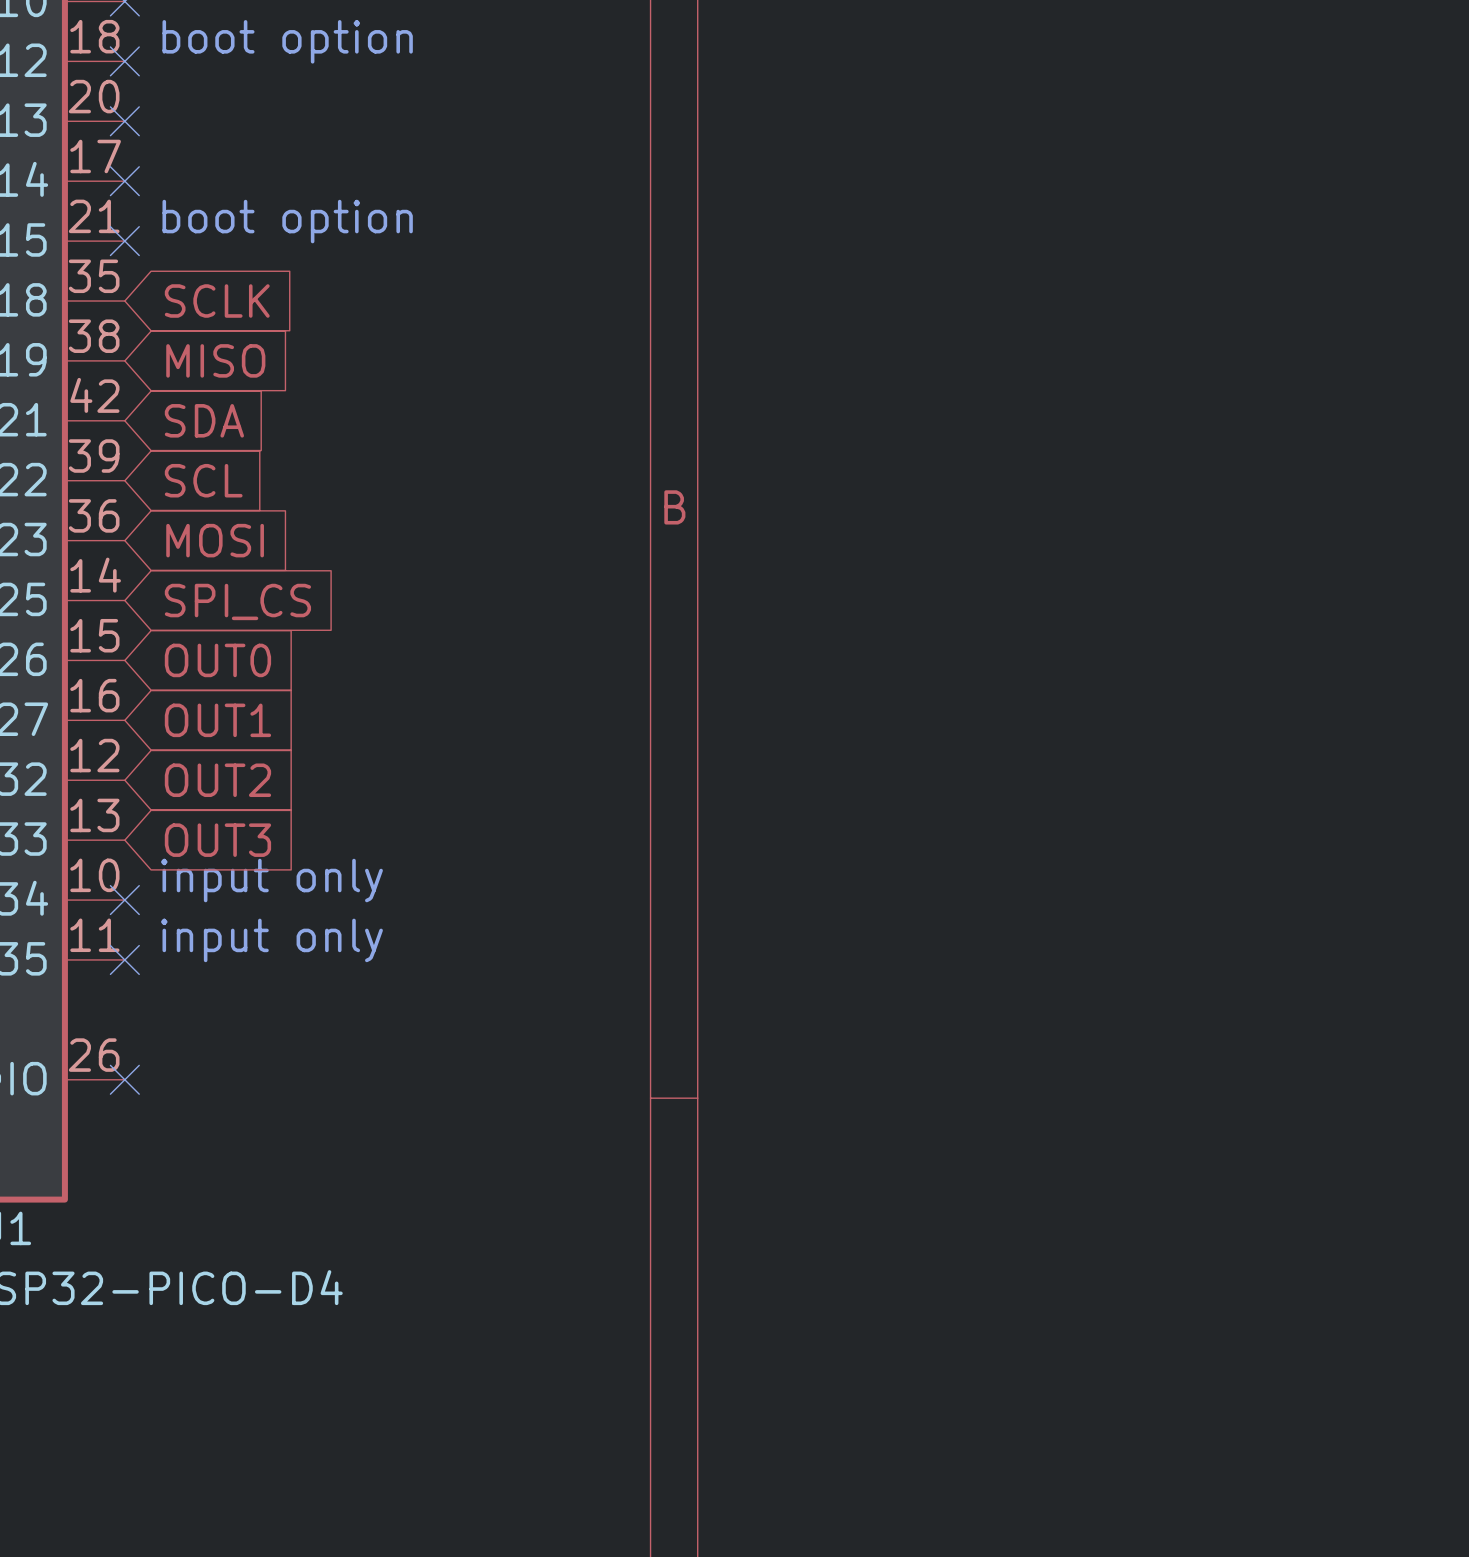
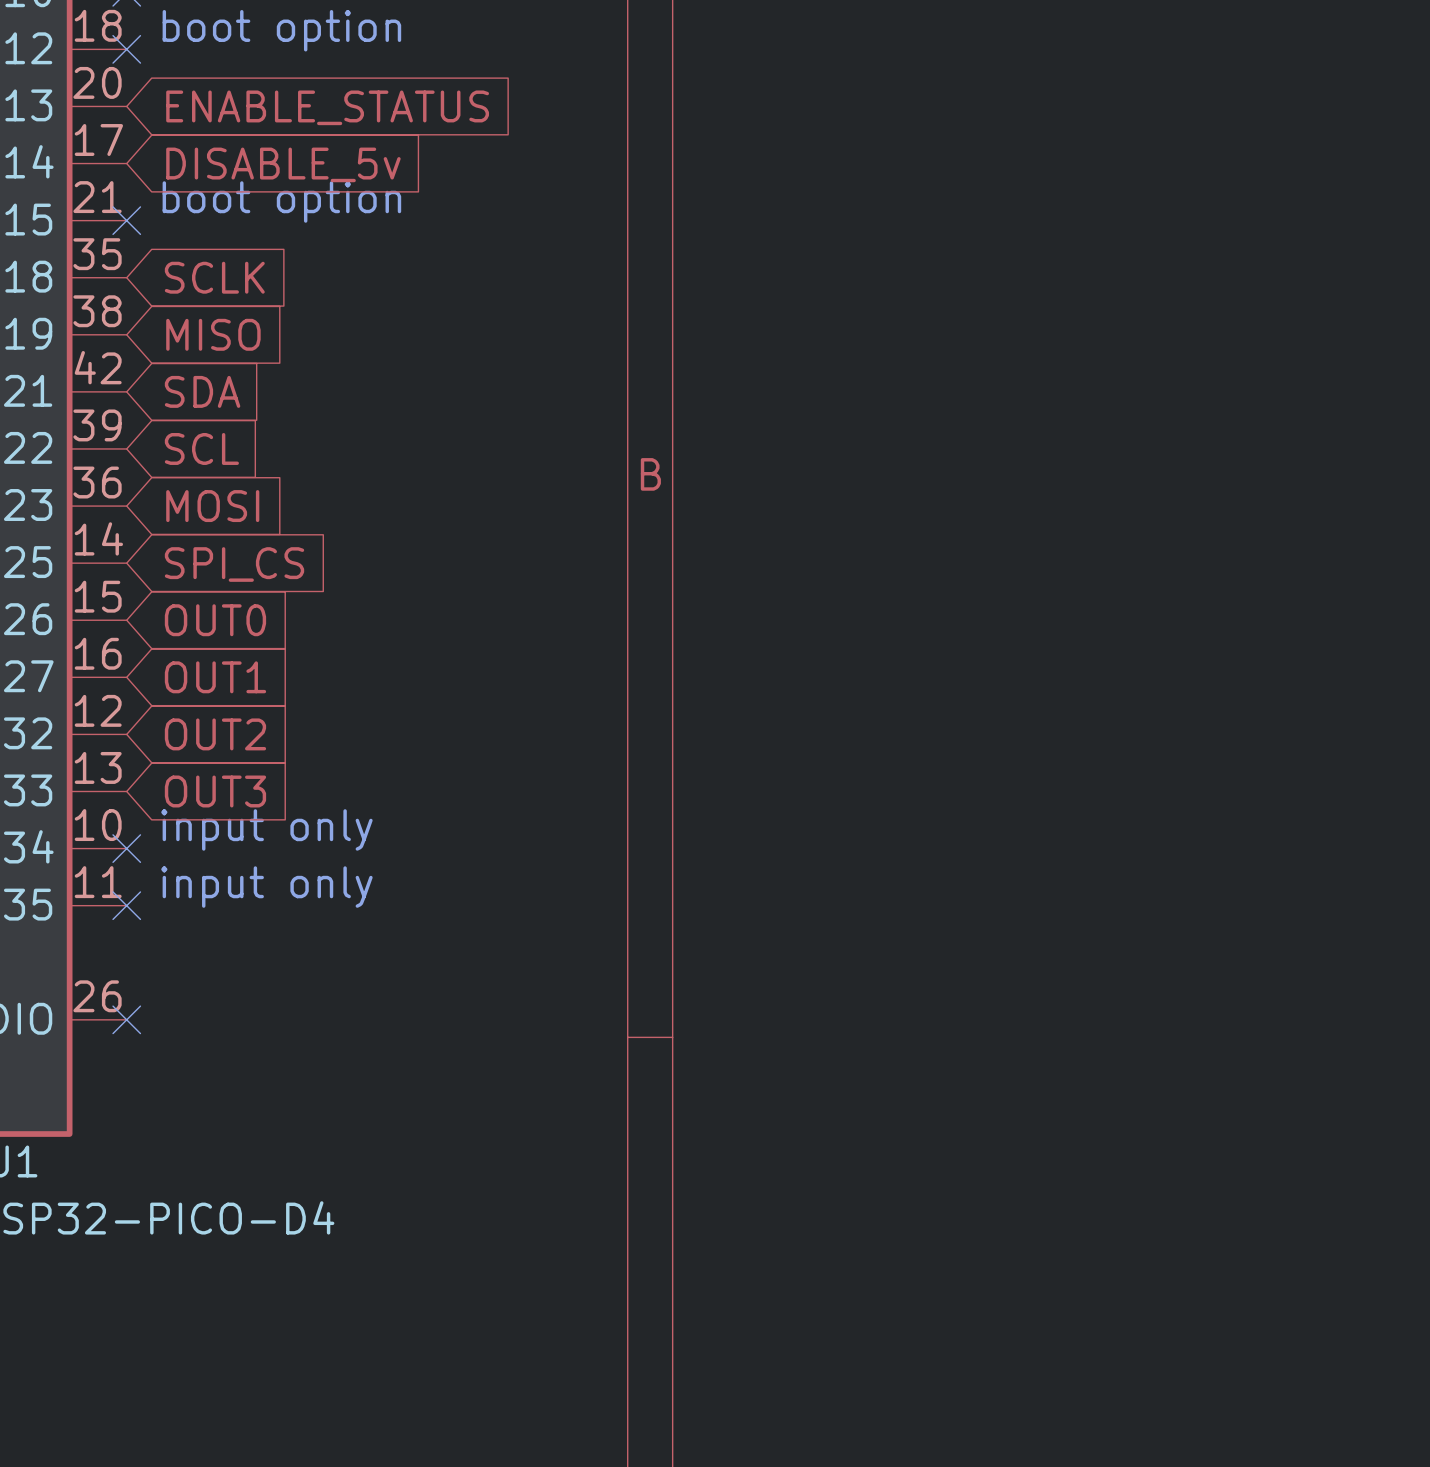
no-connect mark: (124, 121) -> none
global label: none -> ENABLE_STATUS (327, 107)
no-connect mark: (124, 181) -> none
global label: none -> DISABLE_5v (283, 164)

